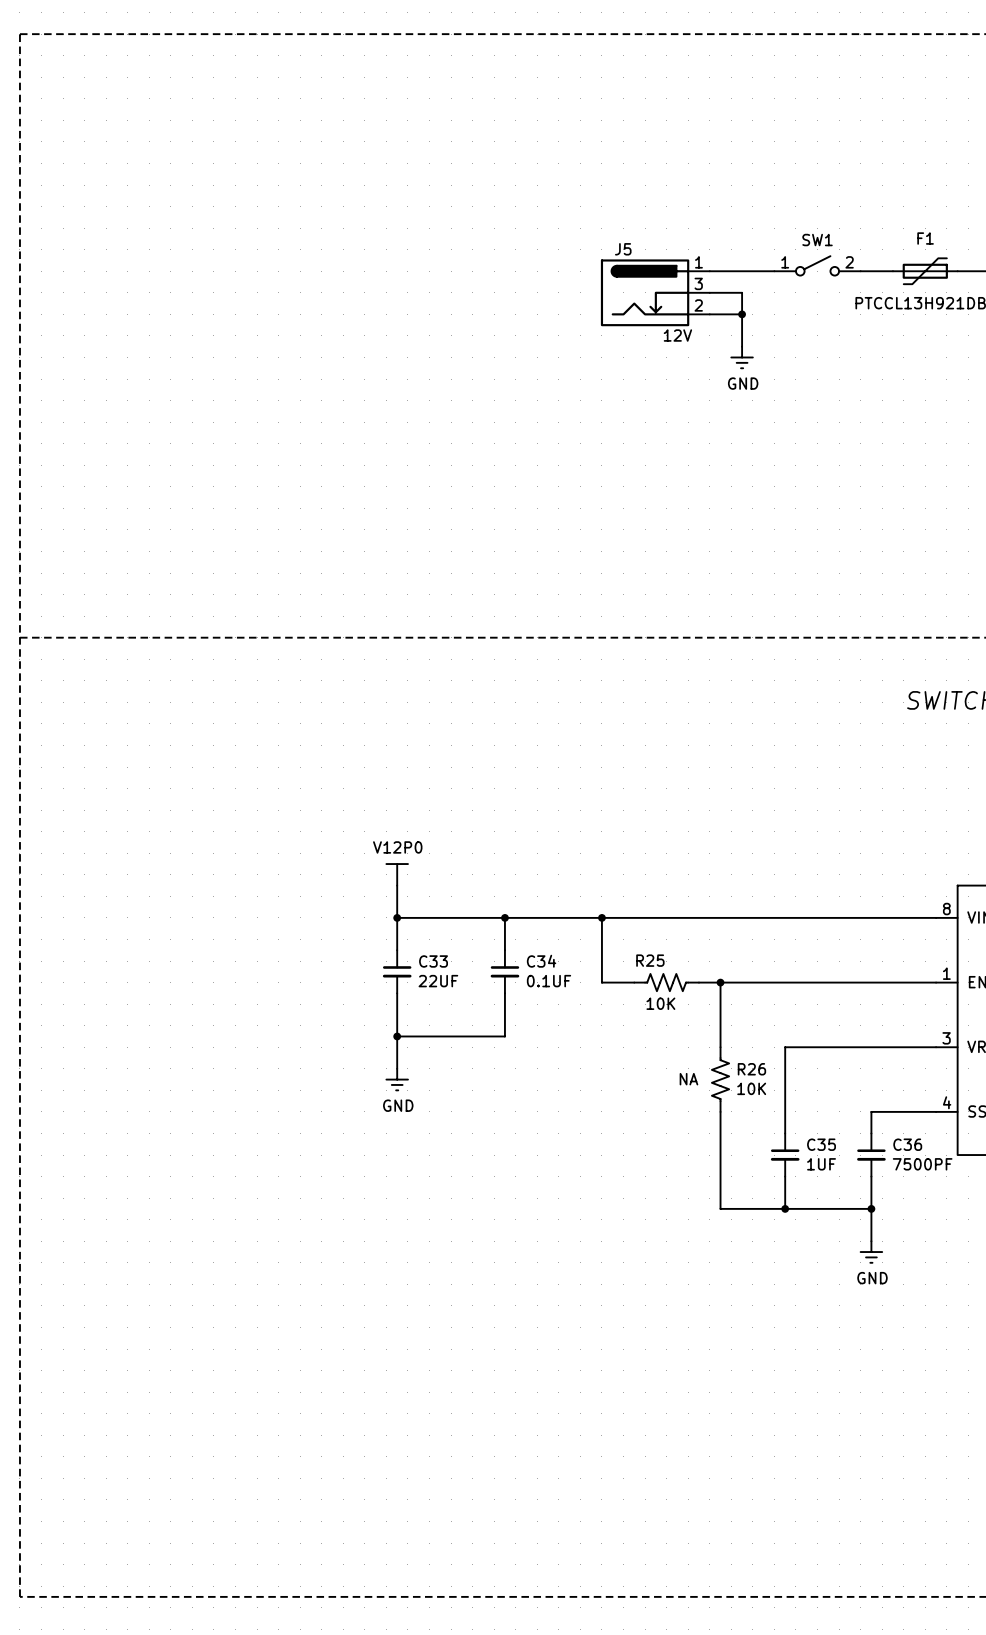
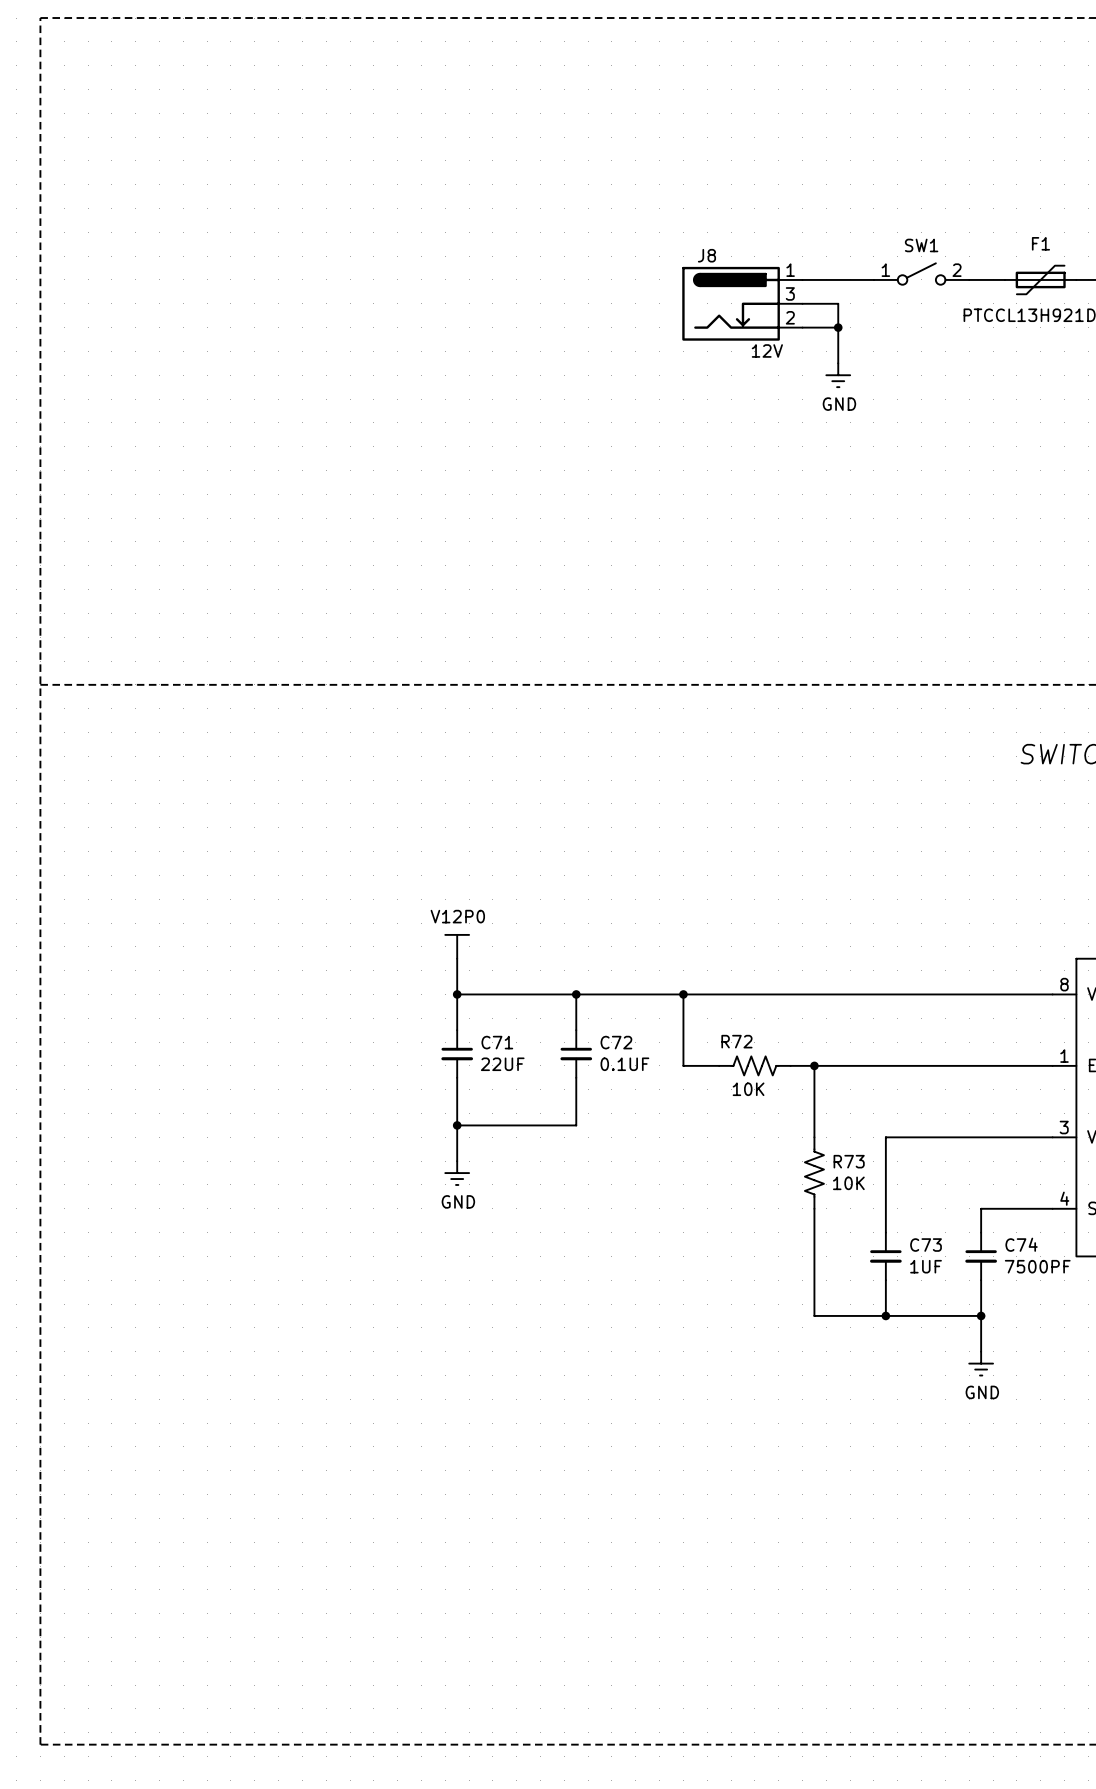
J5 name: J5 (623, 249) -> J8 (706, 255)
R25 name: R25 (650, 960) -> R72 (736, 1041)
C33 name: C33 (433, 961) -> C71 (497, 1042)
C34 name: C34 (541, 961) -> C72 (616, 1042)
R26 name: R26 (751, 1069) -> R73 (849, 1161)
R26 text: NA (688, 1079) -> none
C35 name: C35 (821, 1144) -> C73 (926, 1245)
C36 name: C36 (907, 1144) -> C74 (1021, 1244)

